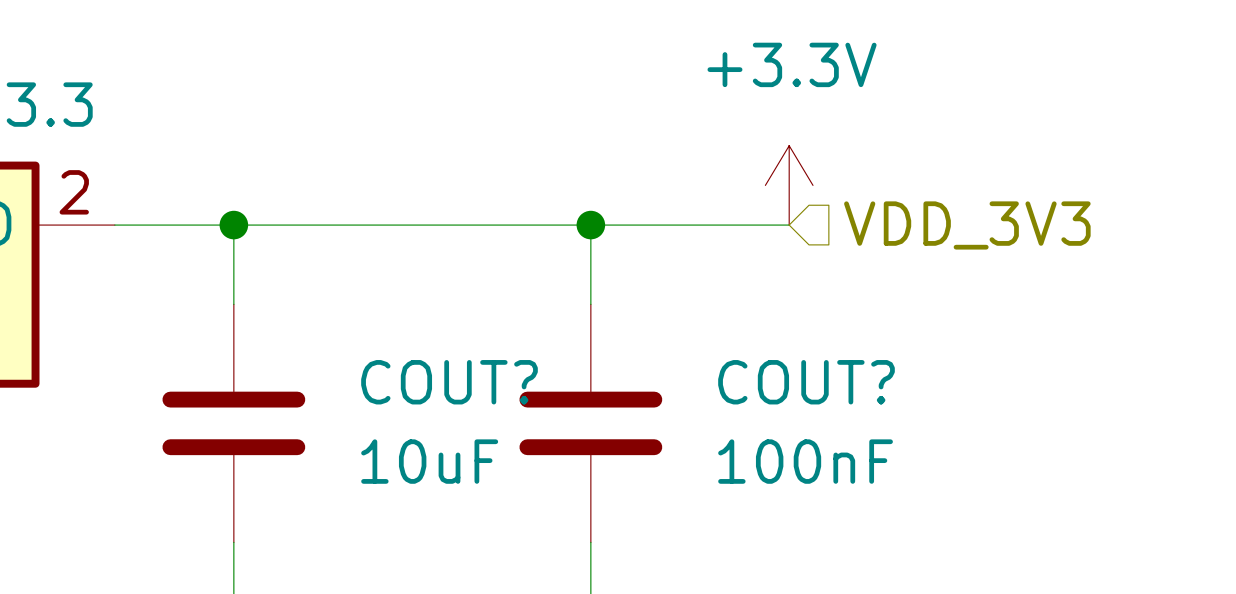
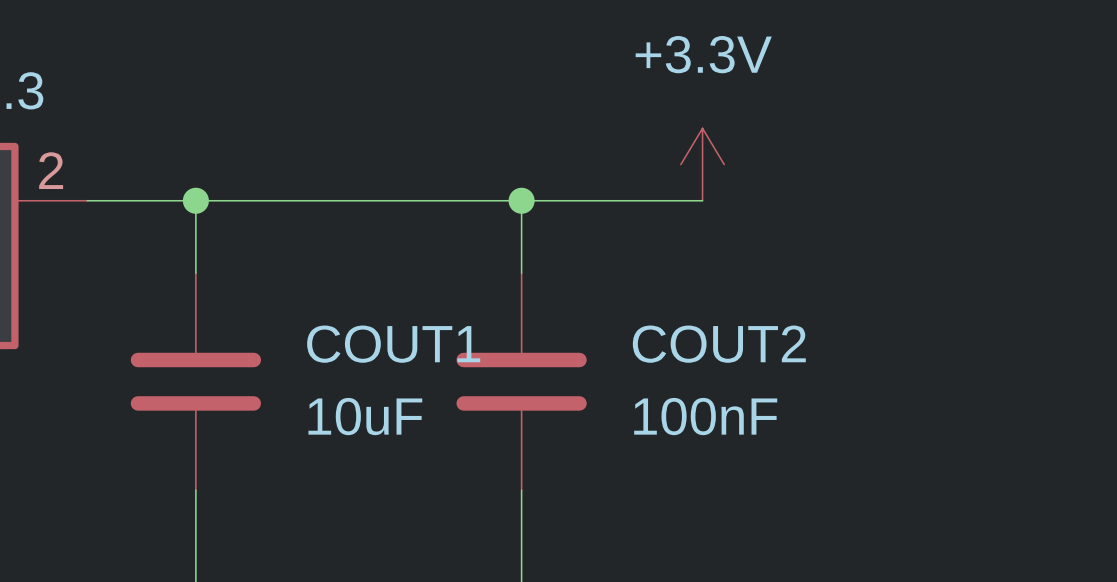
hierarchical label: VDD_3V3 (967, 225) -> none
COUT? name: COUT? (449, 382) -> COUT1 (393, 344)
COUT? name: COUT? (806, 382) -> COUT2 (719, 344)

